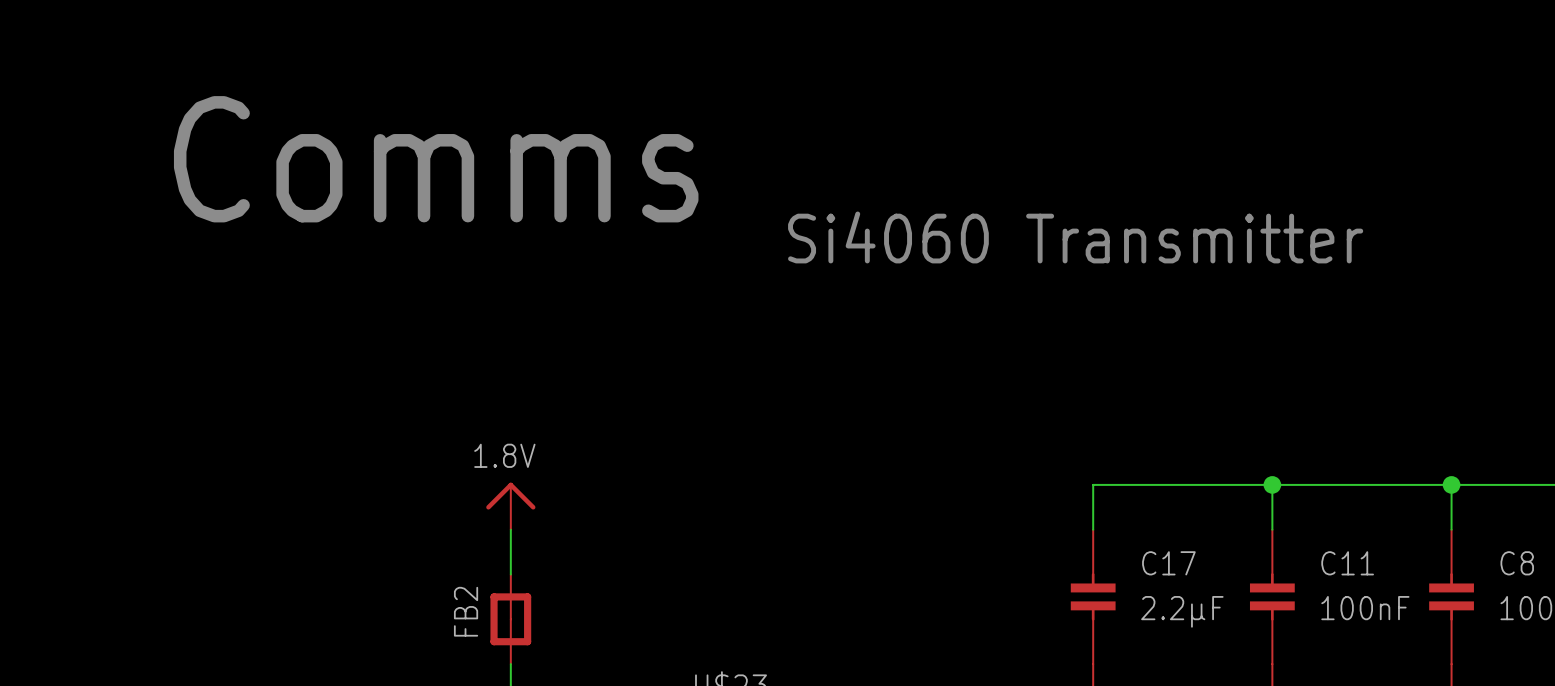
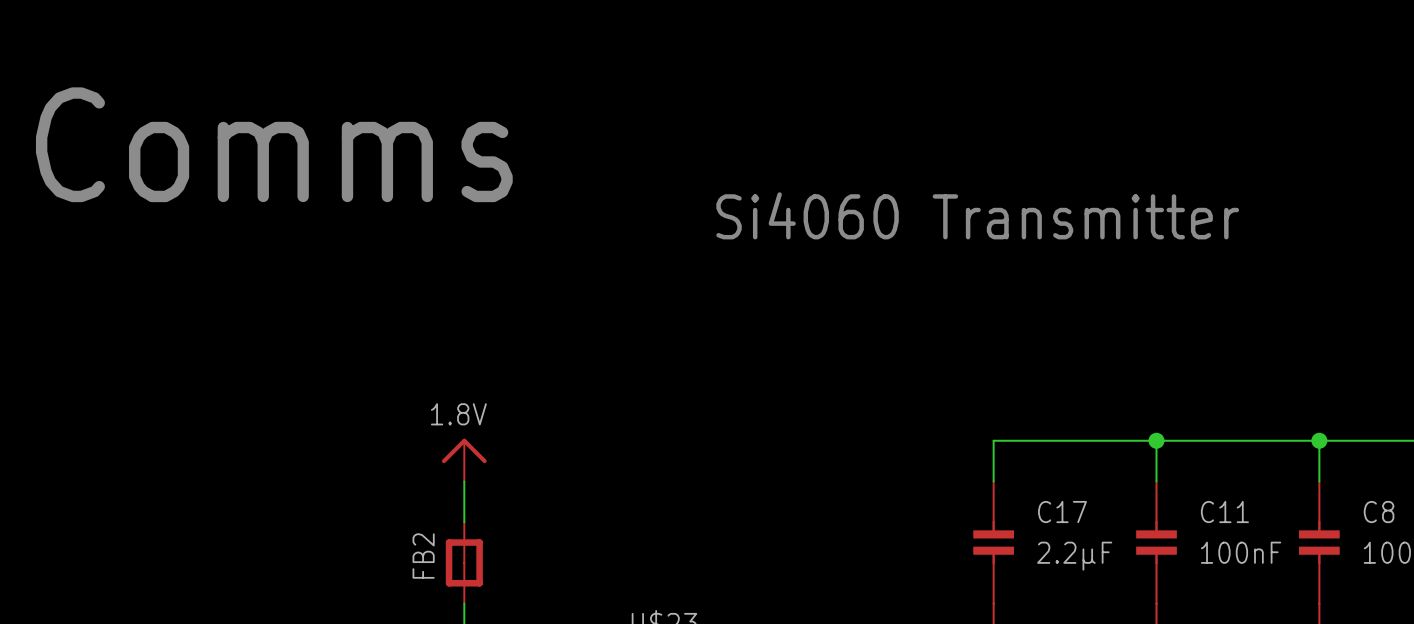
text position: Comms (436, 159) -> Comms (274, 144)

